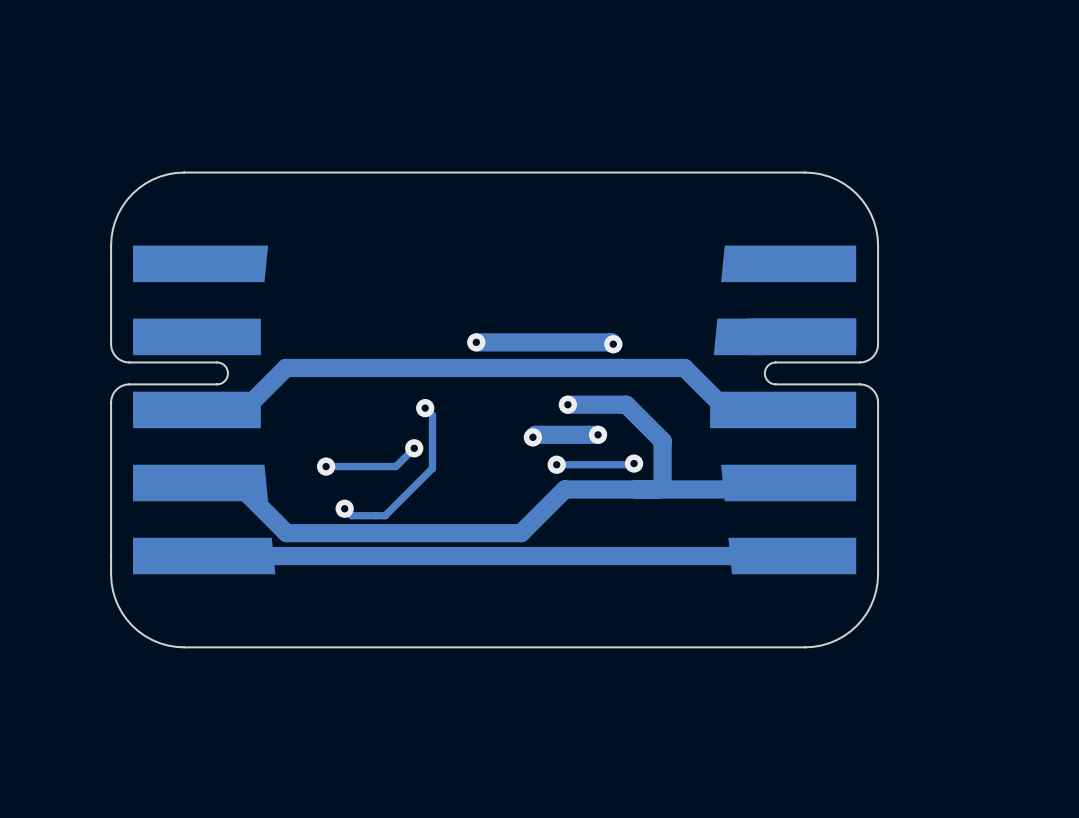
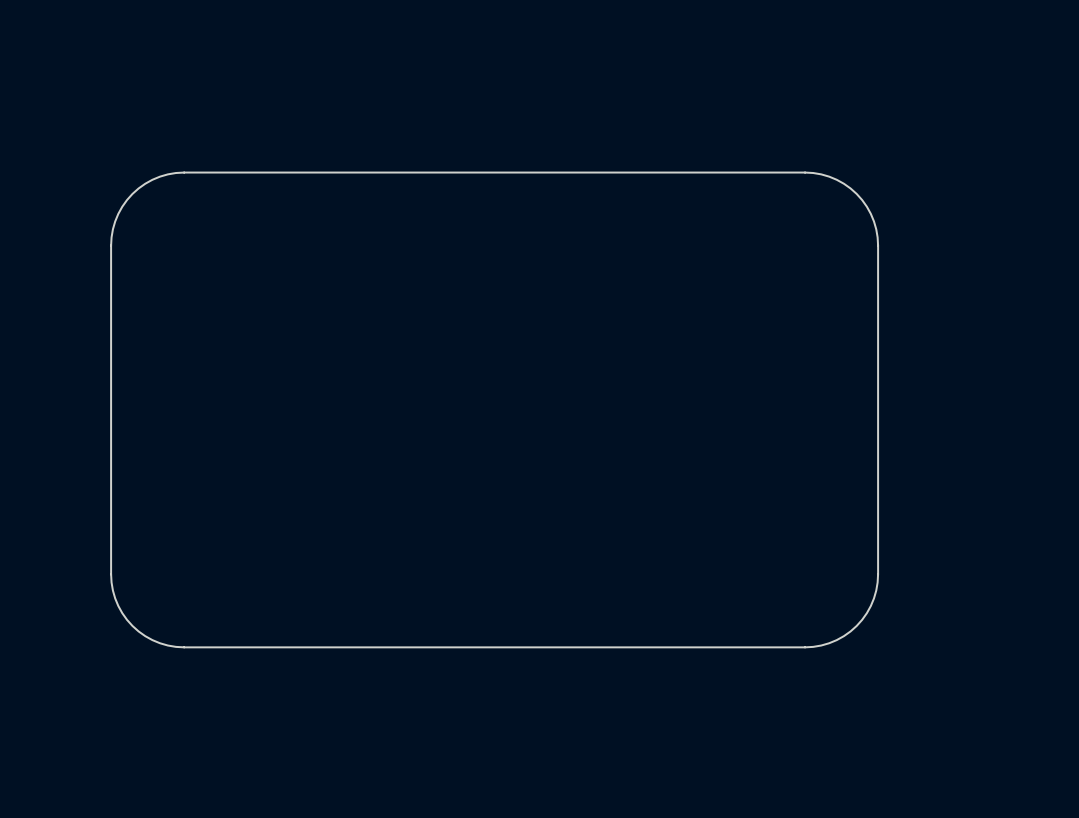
board edge: none -> (111, 263) (111, 556)
board edge: none -> (878, 263) (878, 556)
track: (476, 342) (611, 342) (613, 344) -> none
via: (476, 342) -> none
via: (613, 344) -> none
track: (567, 404) (626, 404) (662, 440) (662, 484) (657, 489) -> none
via: (567, 404) -> none
track: (425, 408) (432, 415) (432, 468) (385, 515) (351, 515) (344, 508) -> none
via: (425, 408) -> none
part: (192, 409) -> none
track: (783, 409) (726, 409) (684, 367) (285, 367) (243, 409) (196, 409) -> none
part: (794, 409) -> none
track: (598, 434) (535, 434) (532, 437) -> none
via: (598, 434) -> none
via: (532, 437) -> none
track: (414, 448) (395, 466) (326, 466) -> none
via: (414, 448) -> none
track: (634, 463) (556, 464) -> none
via: (634, 463) -> none
via: (556, 464) -> none
via: (326, 466) -> none
track: (790, 482) (783, 489) (564, 489) (521, 533) (286, 533) (236, 482) (198, 482) -> none
via: (344, 508) -> none
track: (794, 556) (202, 556) -> none

